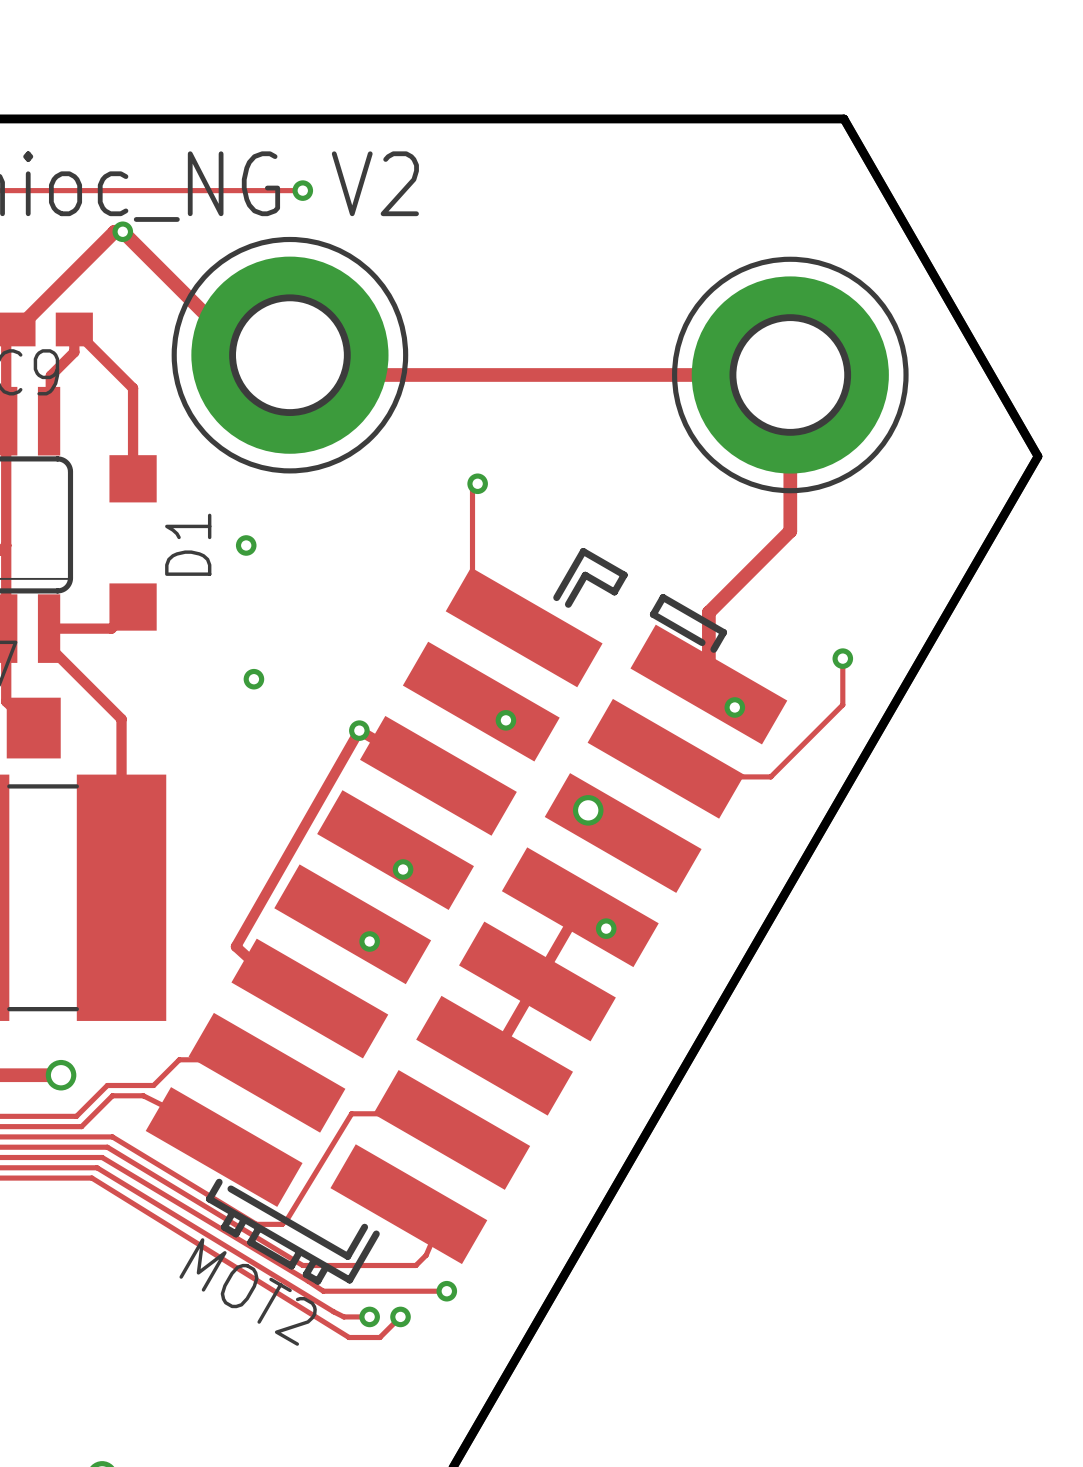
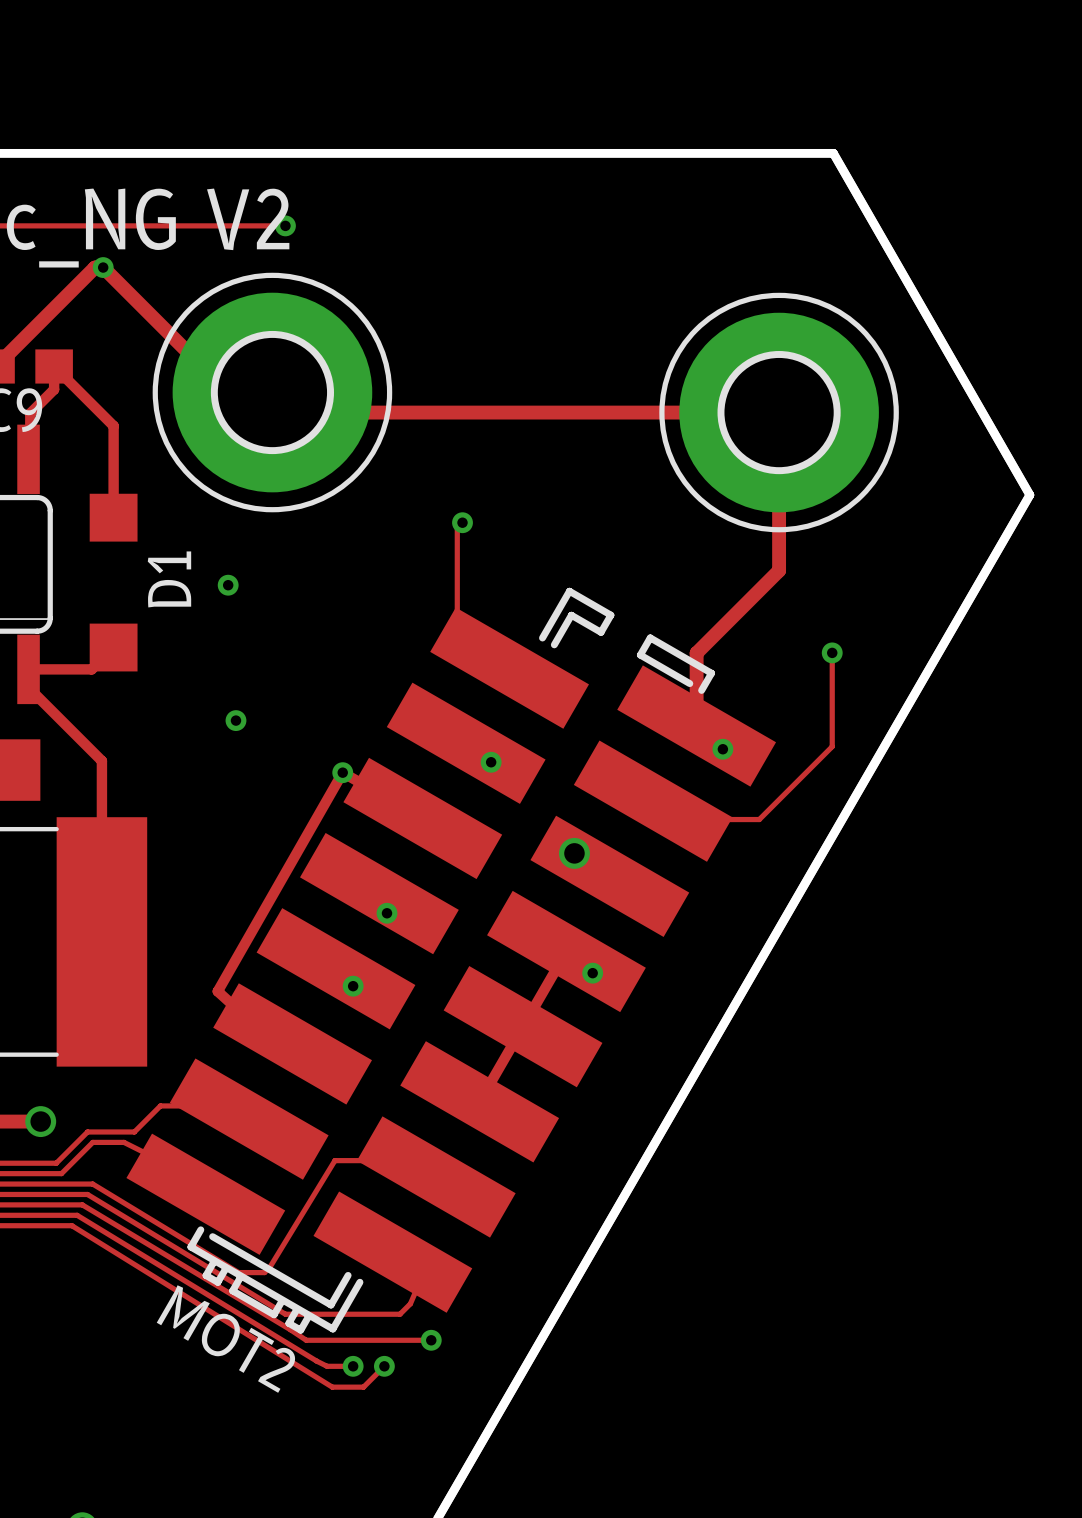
track: none -> (832, 652) (832, 699)
via position: (842, 658) -> (832, 652)

